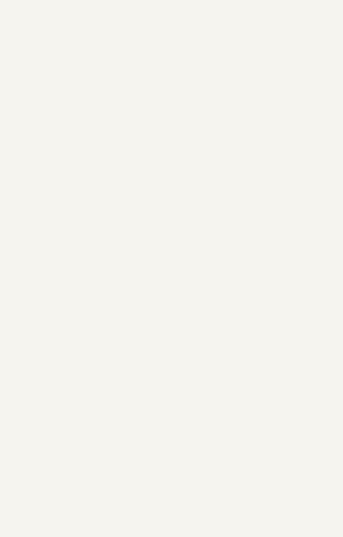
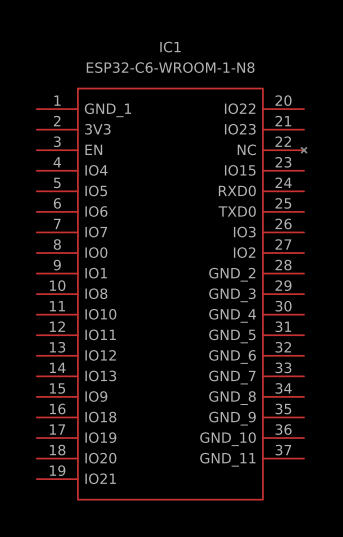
IC1: none -> ESP32-C6-WROOM-1-N8 (171, 294)

